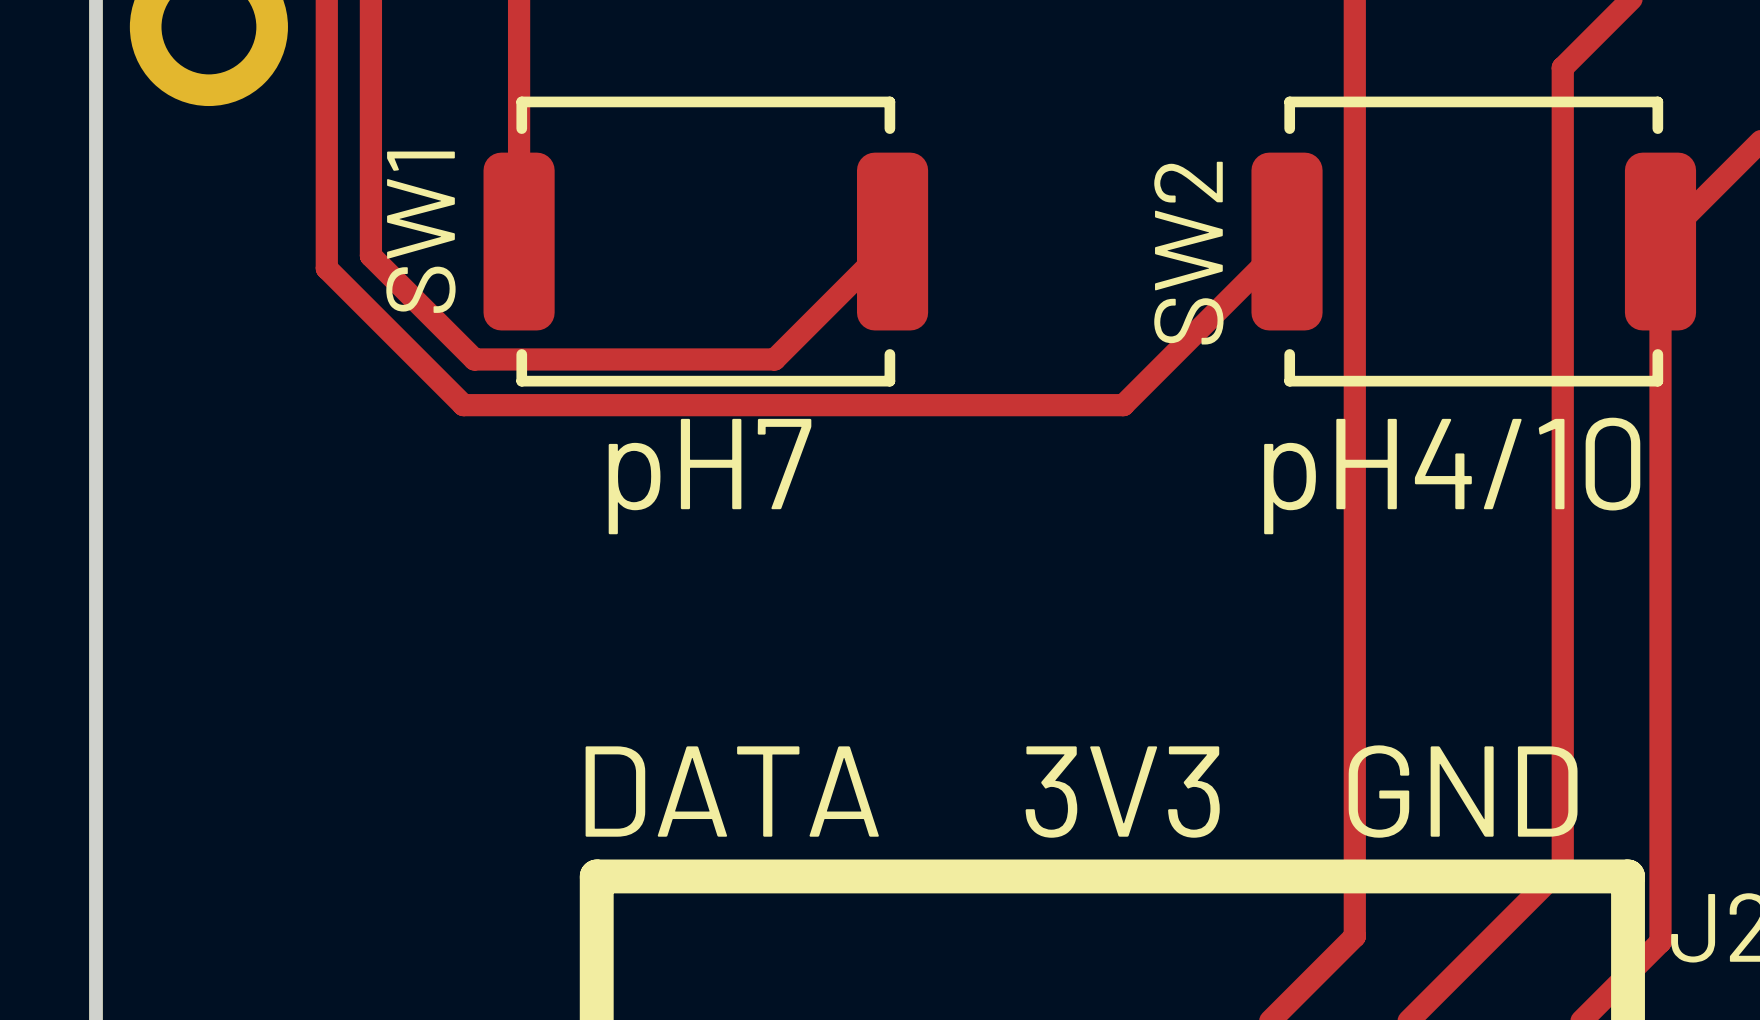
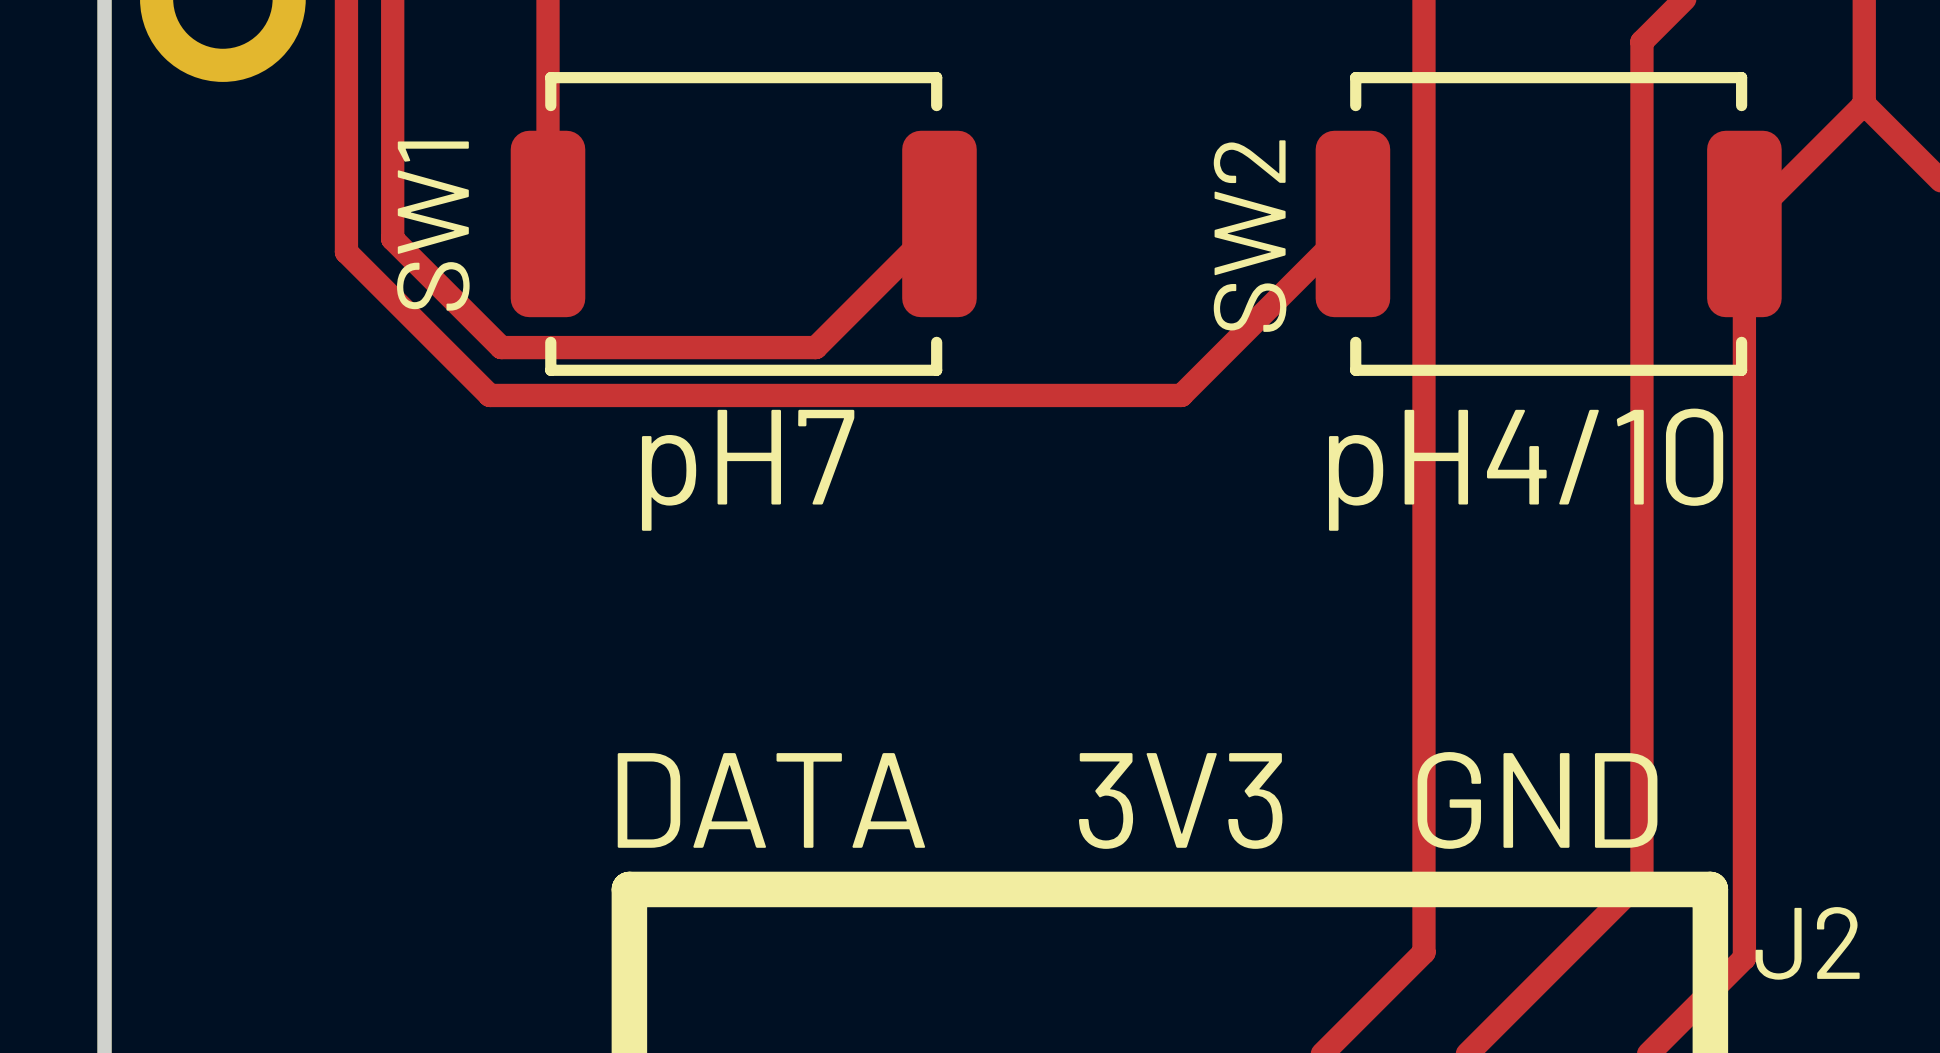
SW1 name position: SW1 (420, 232) -> SW1 (433, 226)

